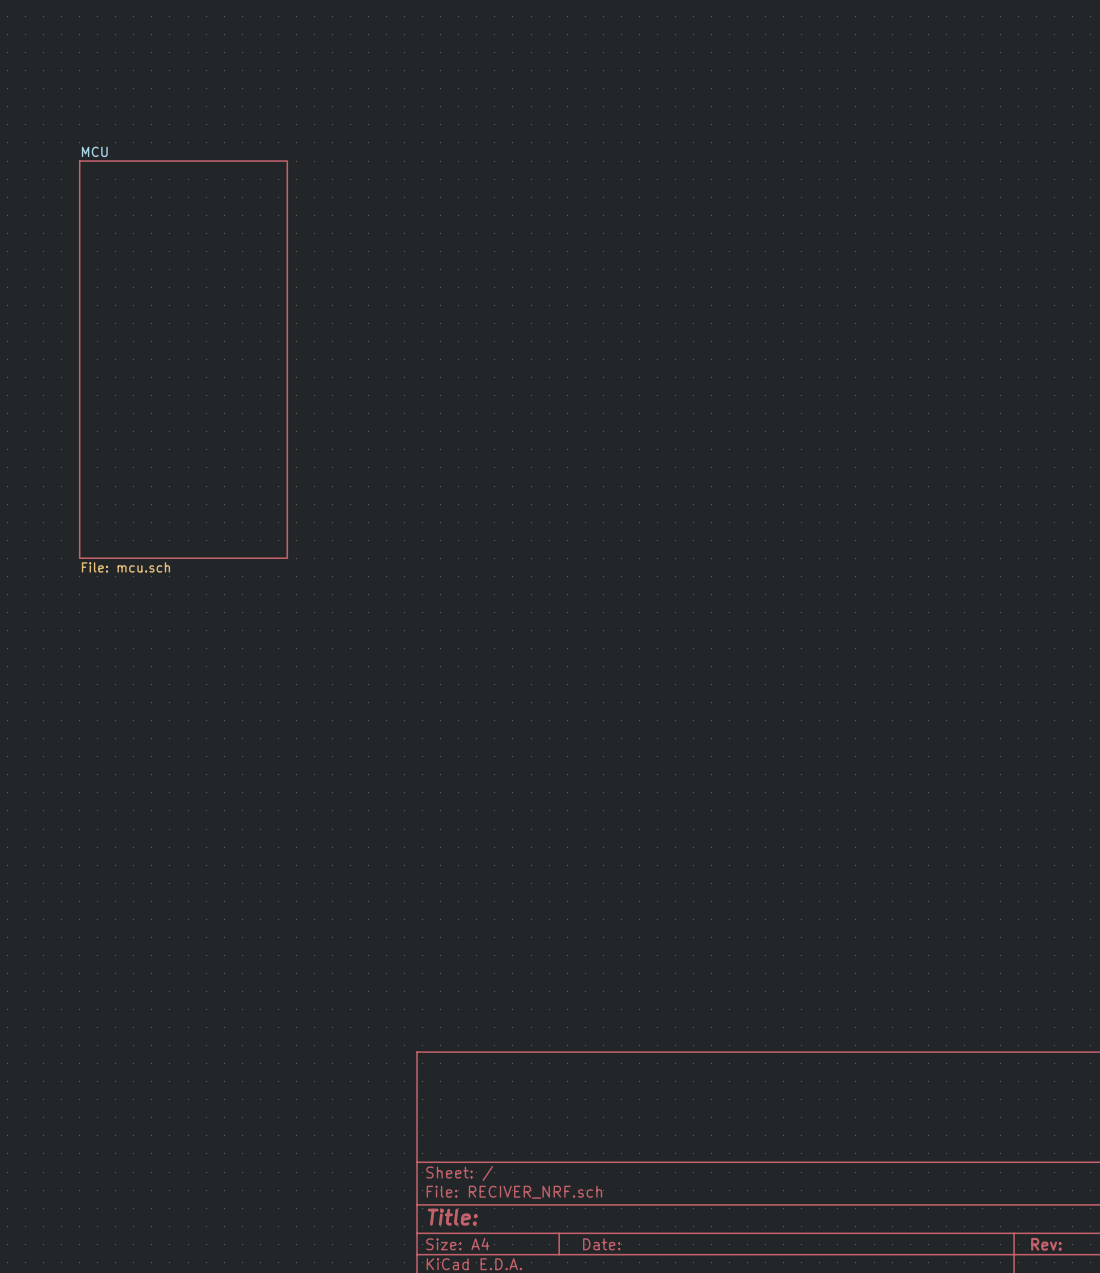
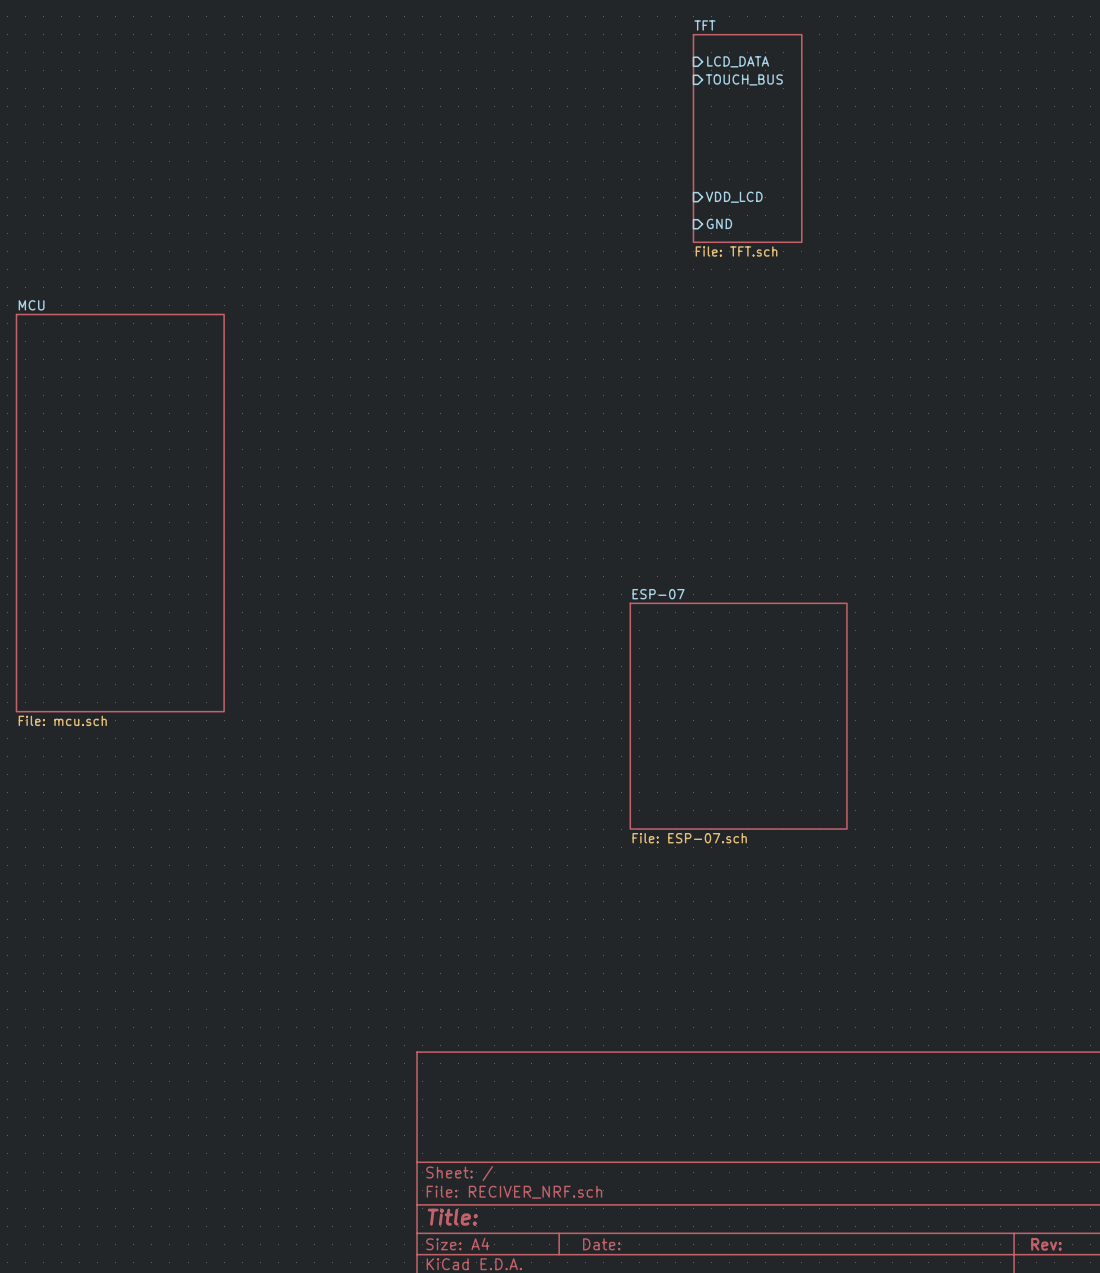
sheet pin: none -> LCD_DATA (738, 61)
sheet pin: none -> TOUCH_BUS (744, 79)
sheet TFT: none -> File: TFT.sch (747, 138)
sheet pin: none -> VDD_LCD (734, 197)
sheet pin: none -> GND (719, 223)
sheet MCU position: (183, 359) -> (120, 513)
sheet ESP-07: none -> File: ESP-07.sch (738, 716)

